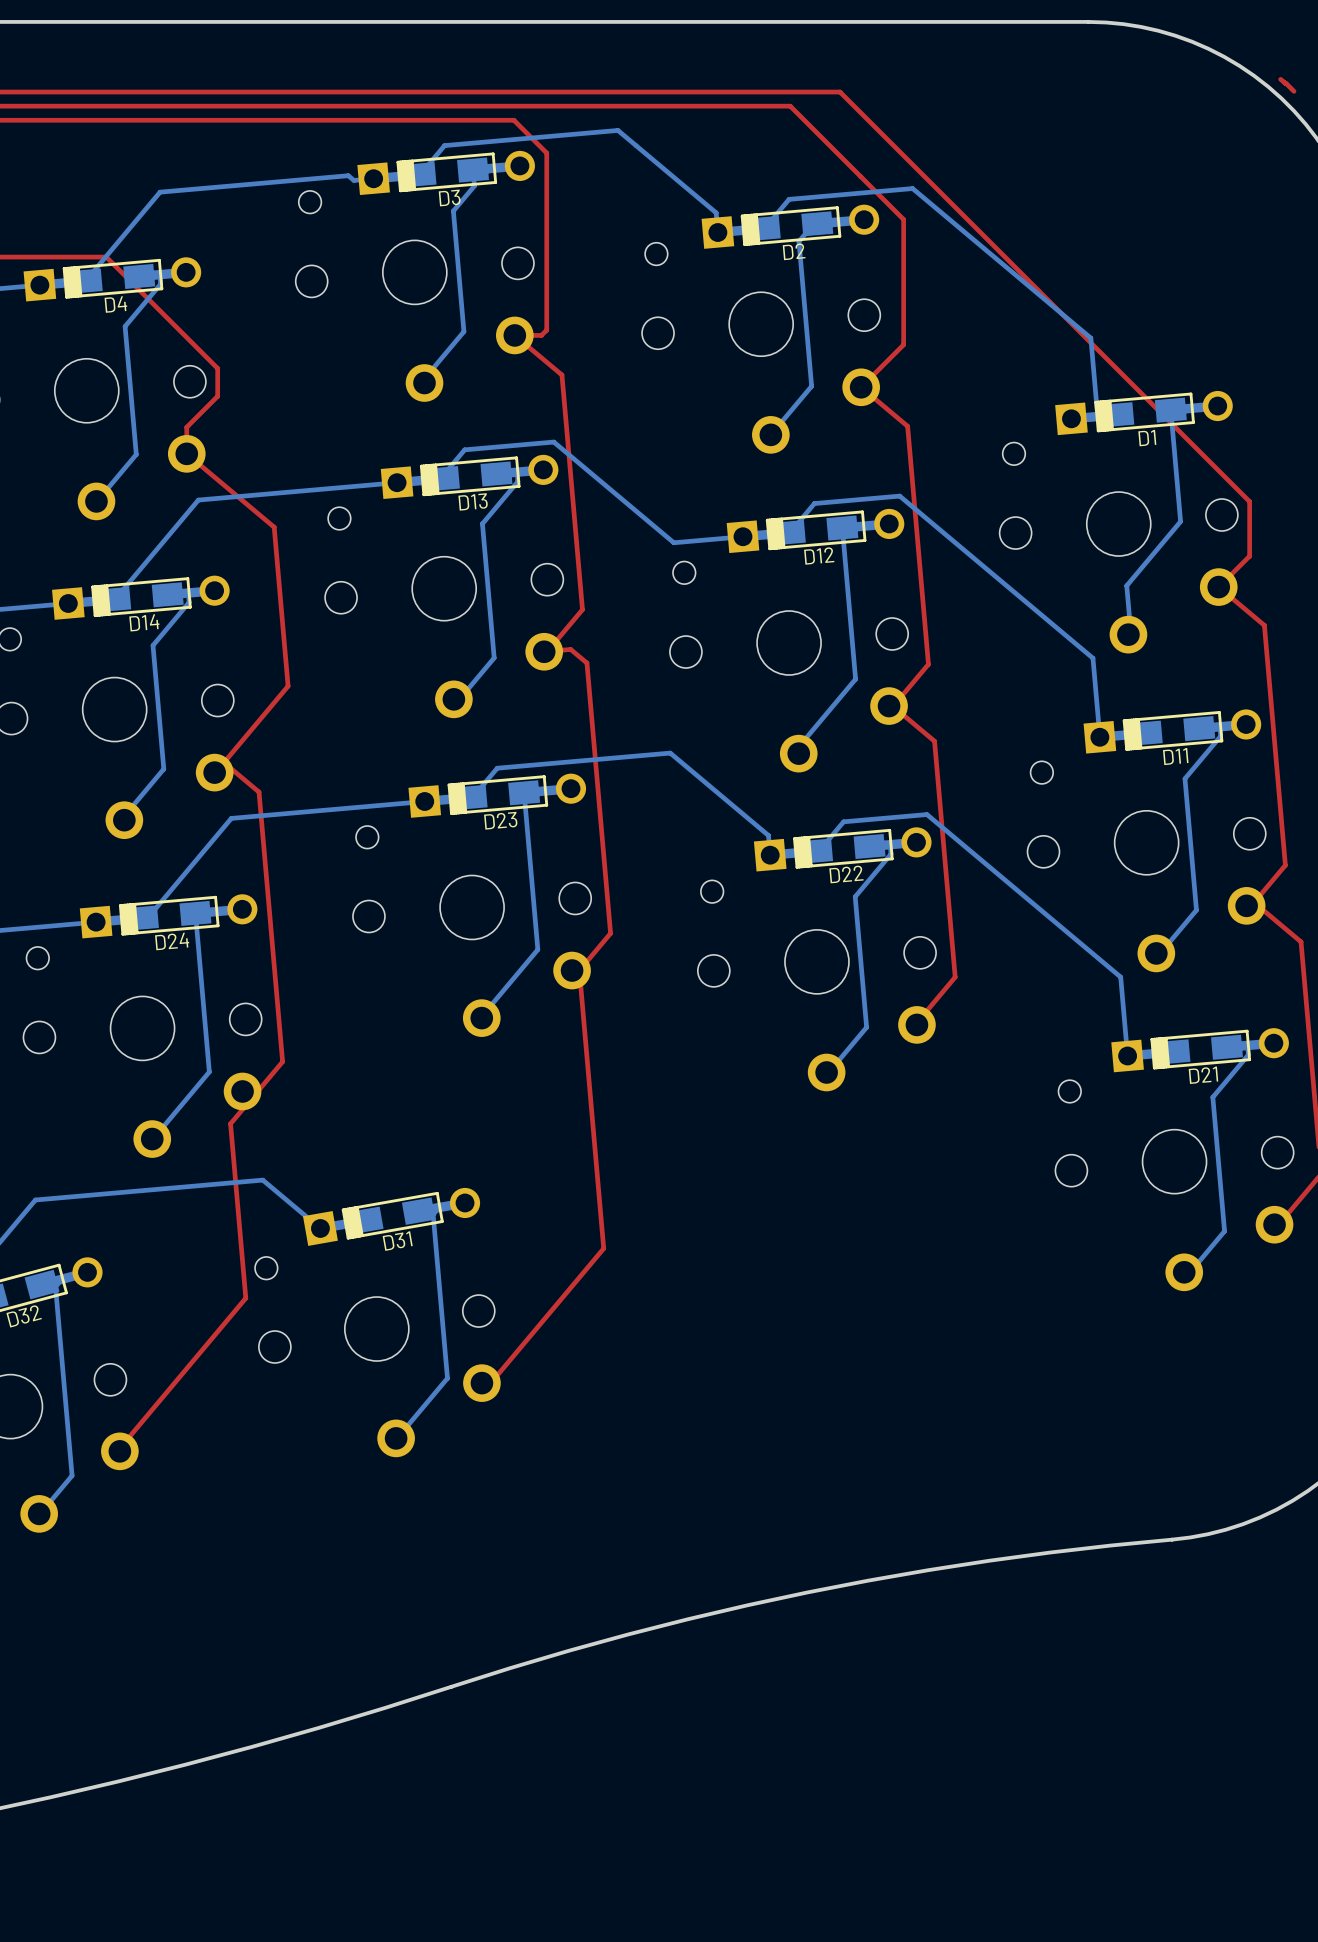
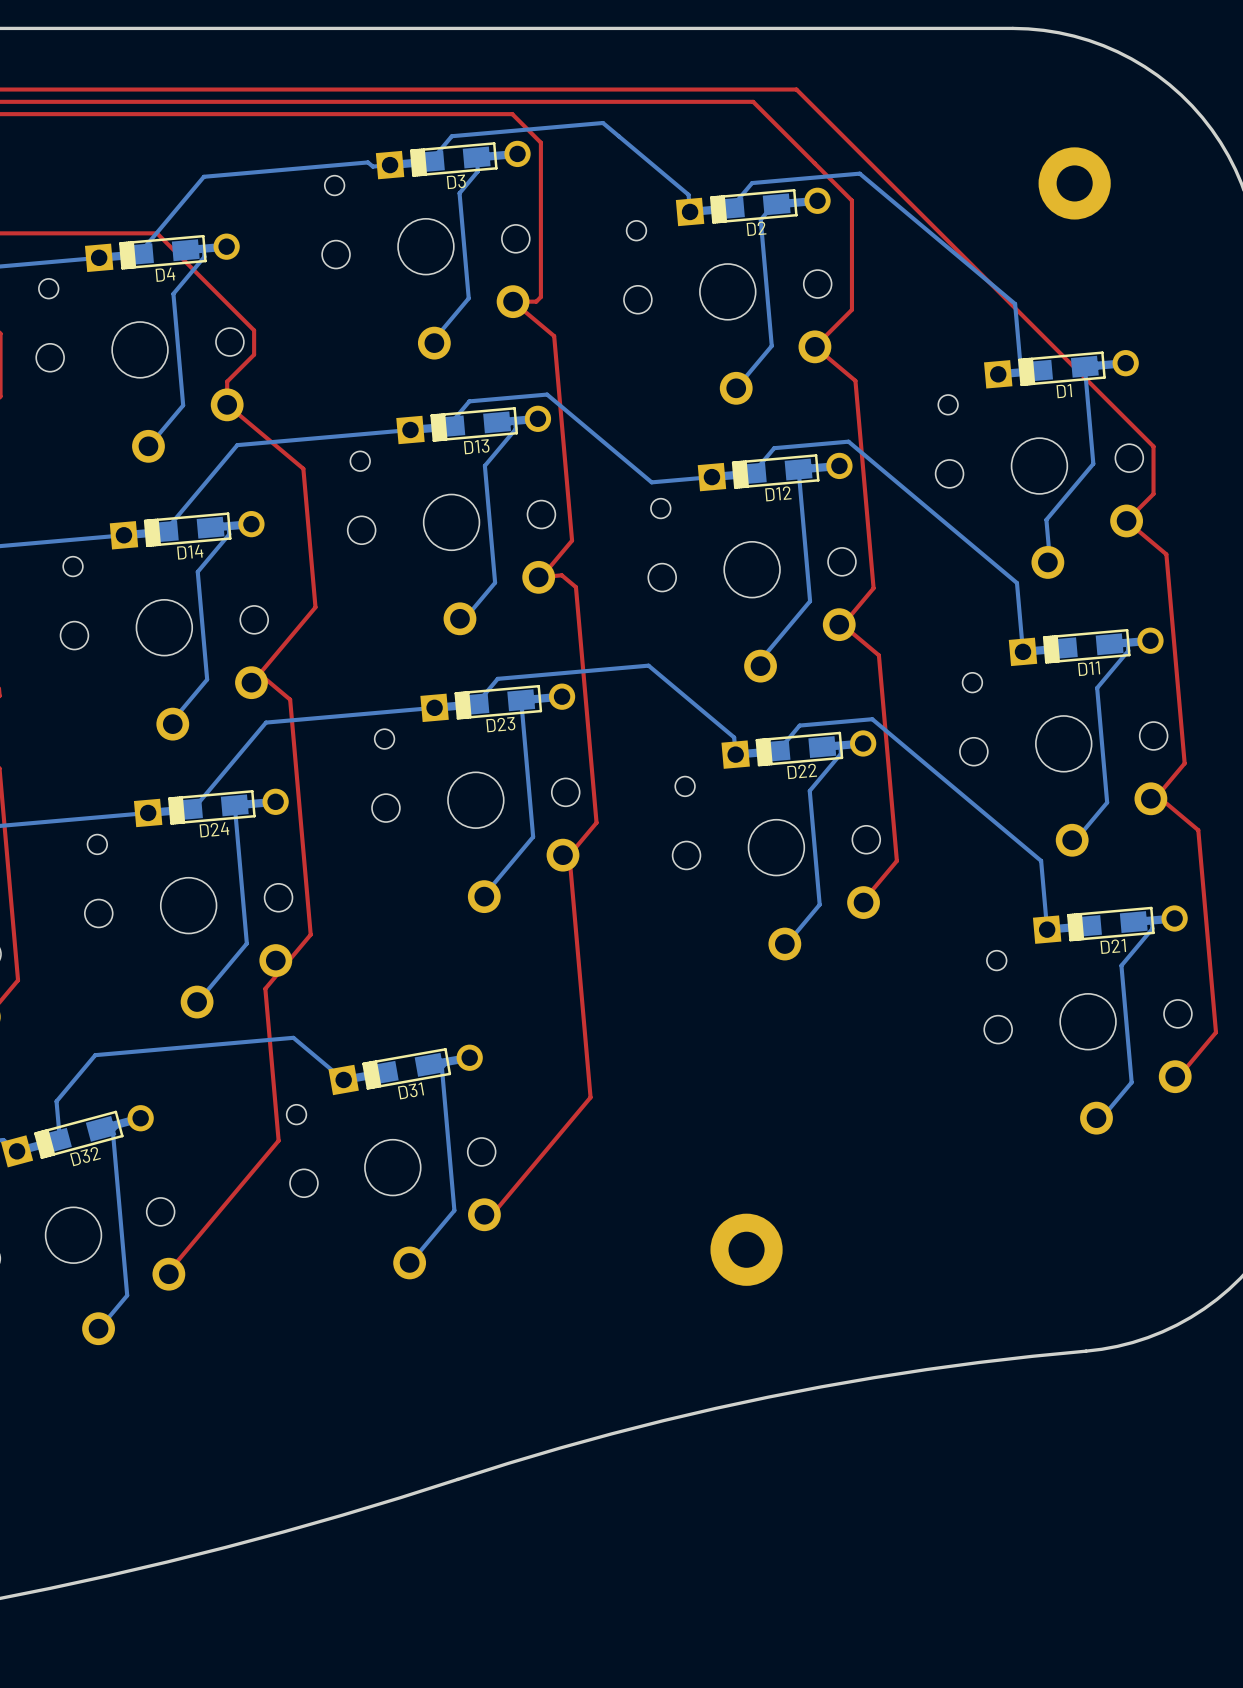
top track: (1280, 79) (1294, 91) -> none
part: none -> (1074, 183)
part: none -> (746, 1249)

